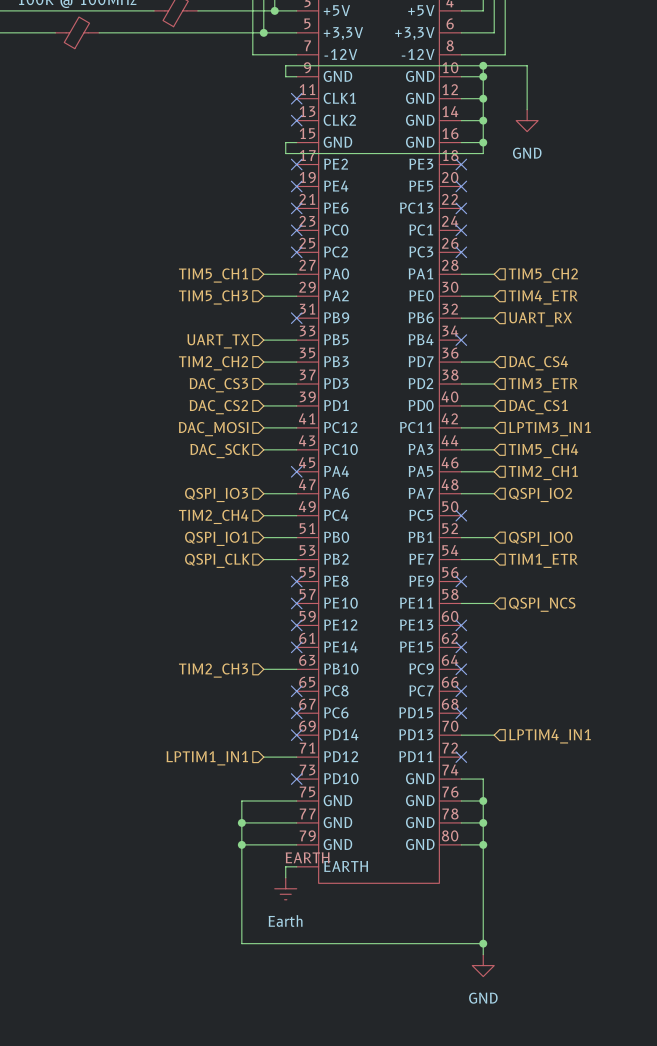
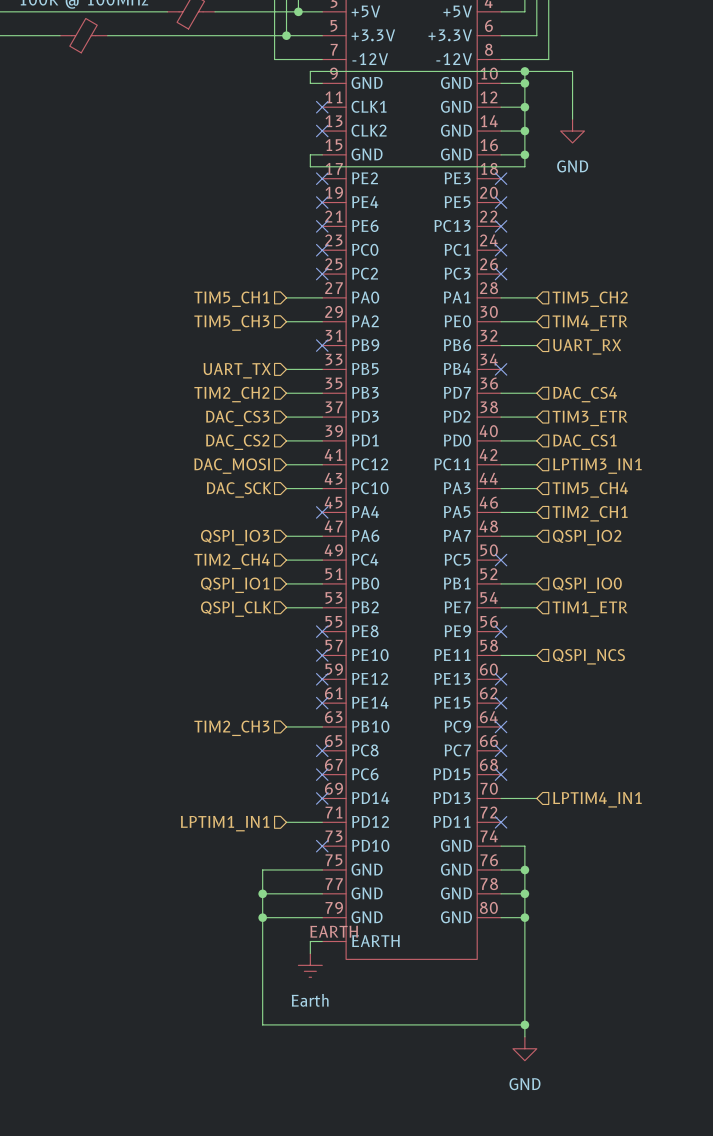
part pin name: +3,3V (343, 33) -> +3.3V (373, 35)
part pin name: +3,3V (414, 33) -> +3.3V (450, 35)

